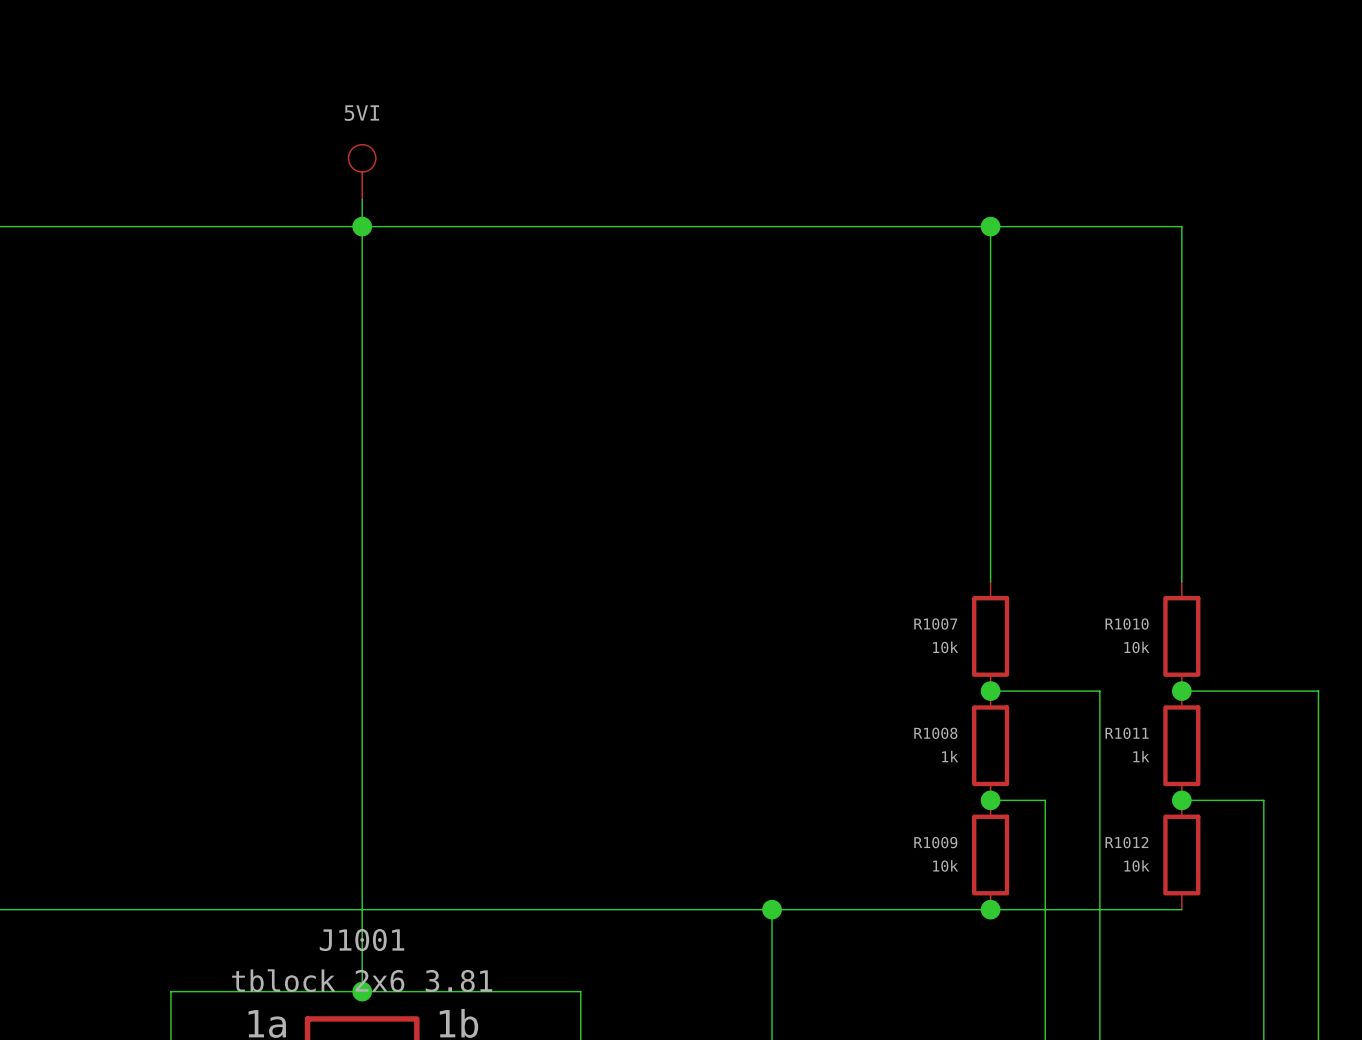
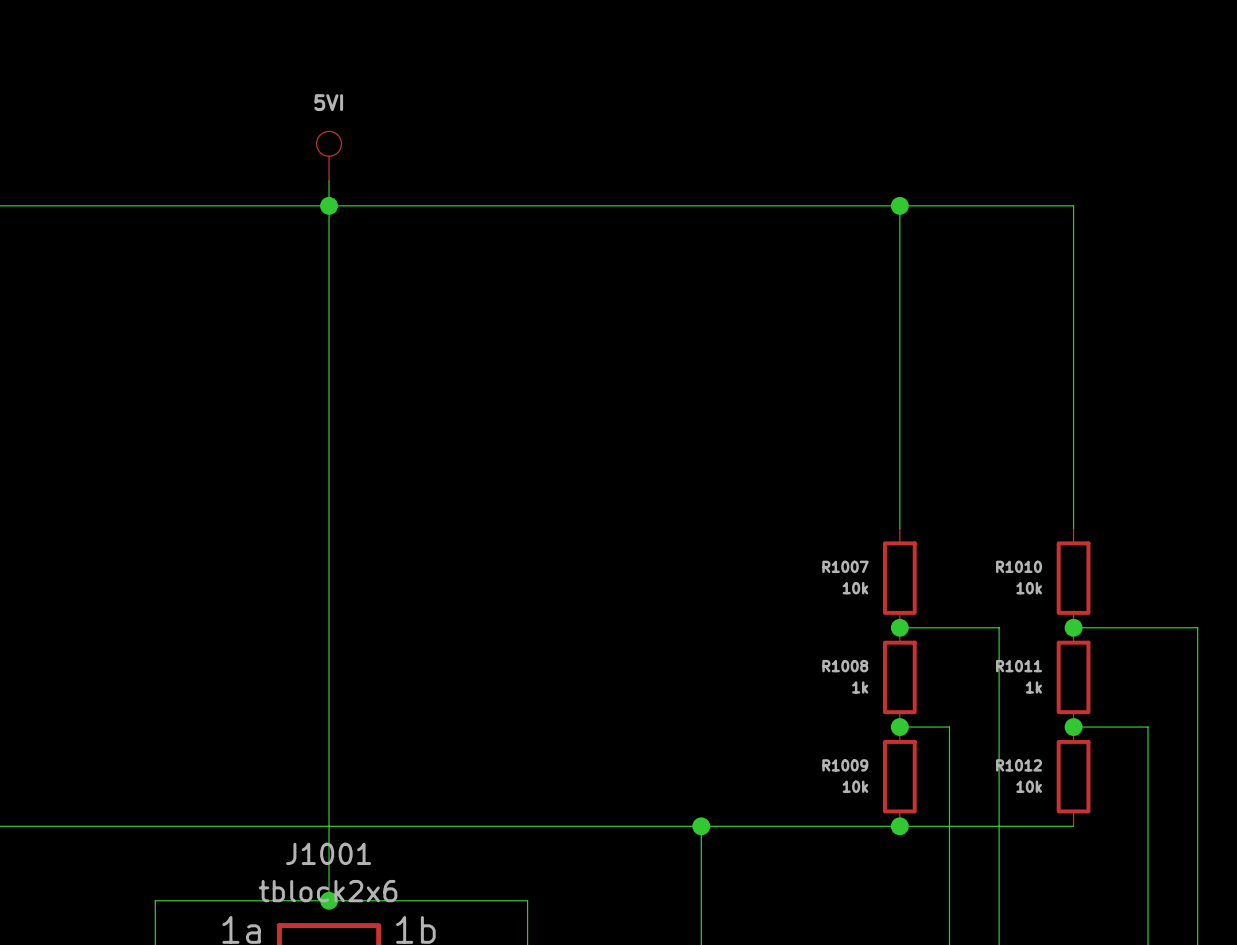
J1001 value: tblock 2x6 3.81 (362, 980) -> tblock2x6 (328, 891)

